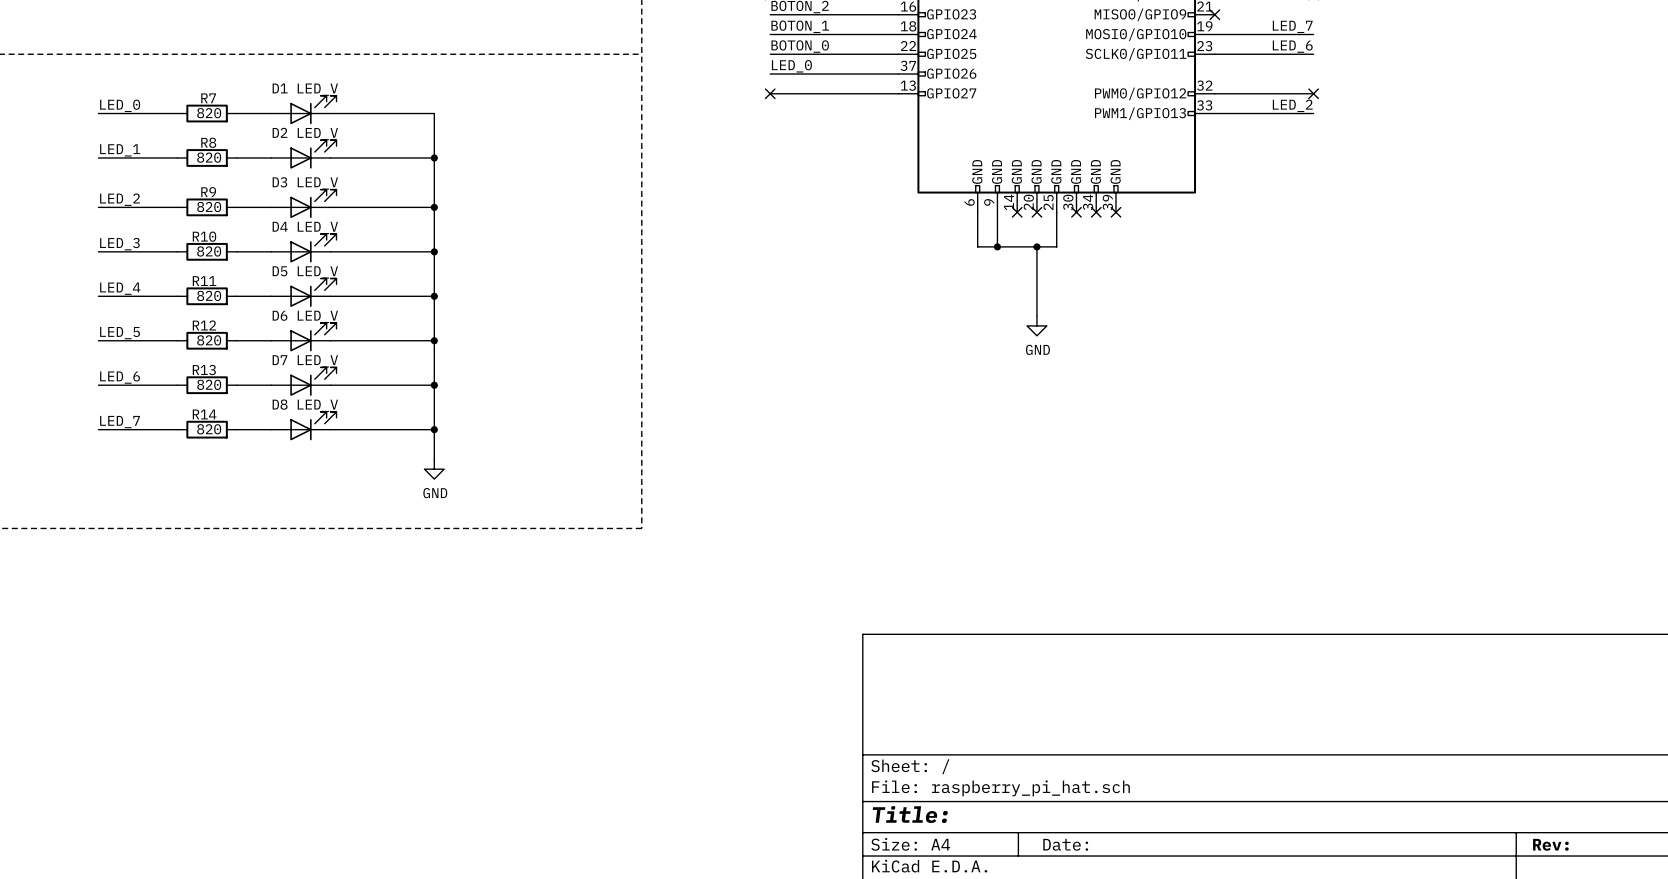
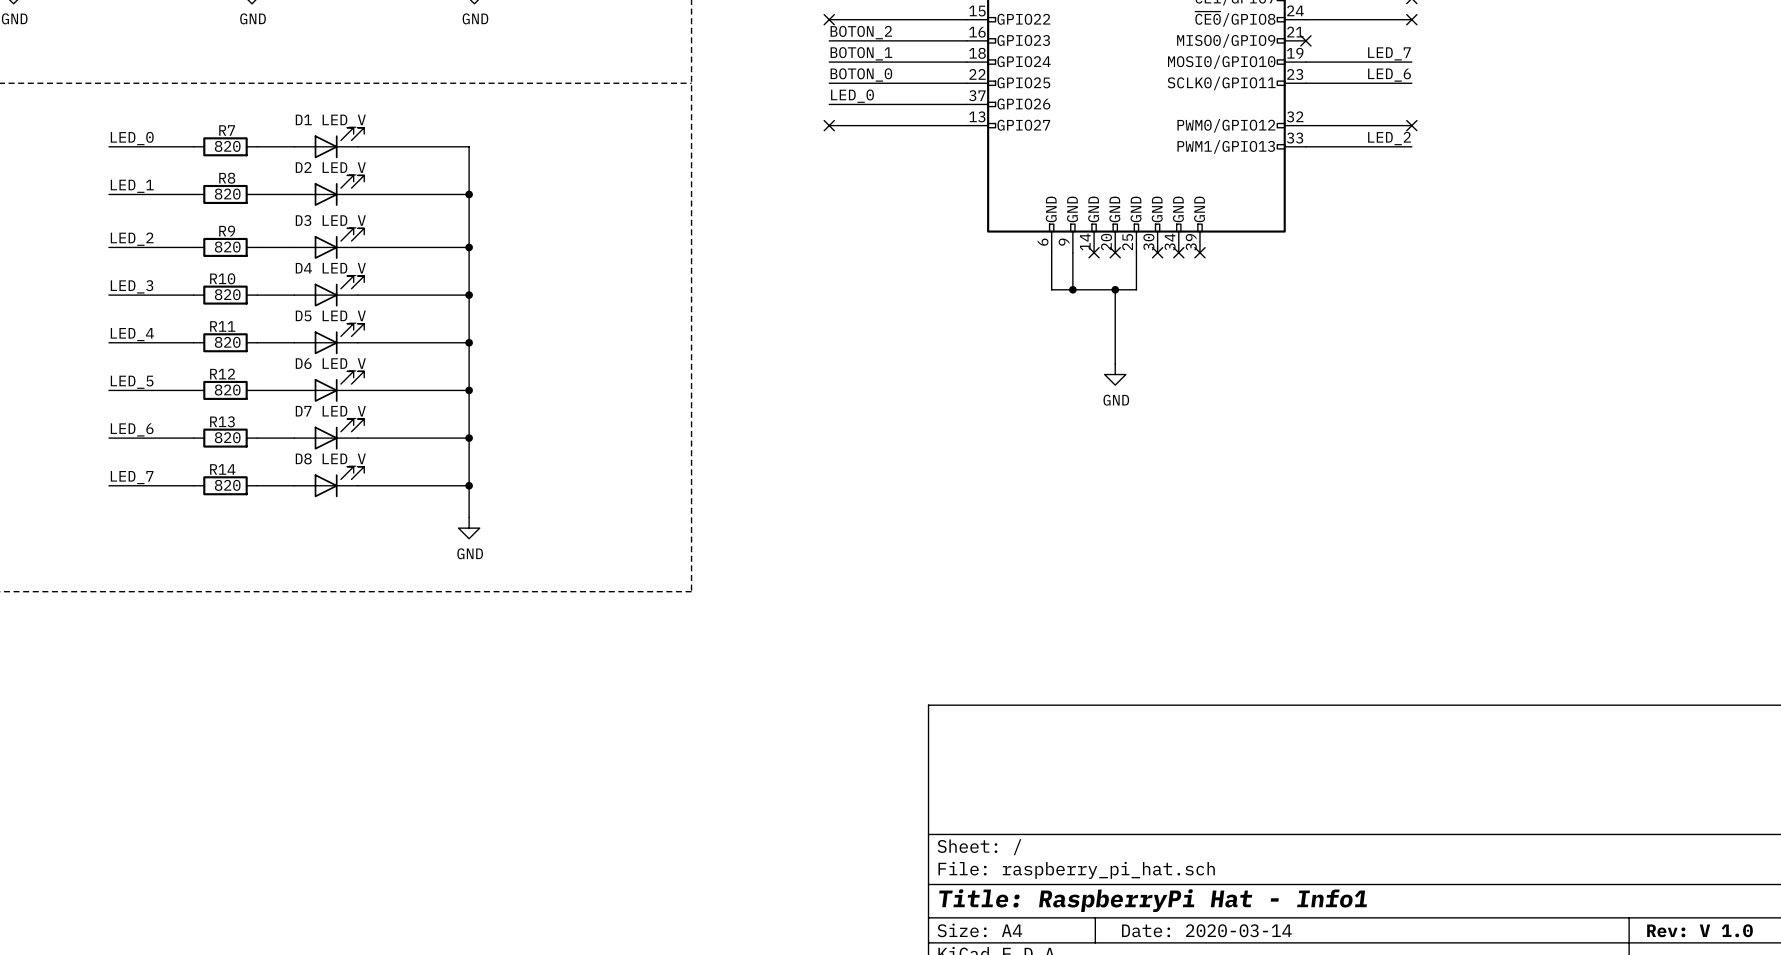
title block: Title: (910, 814) -> Title: RaspberryPi Hat - Info1 (1153, 900)
title block: Date: (1065, 844) -> Date: 2020-03-14 (1206, 930)
title block: Rev: (1550, 844) -> Rev: V 1.0 (1700, 930)

